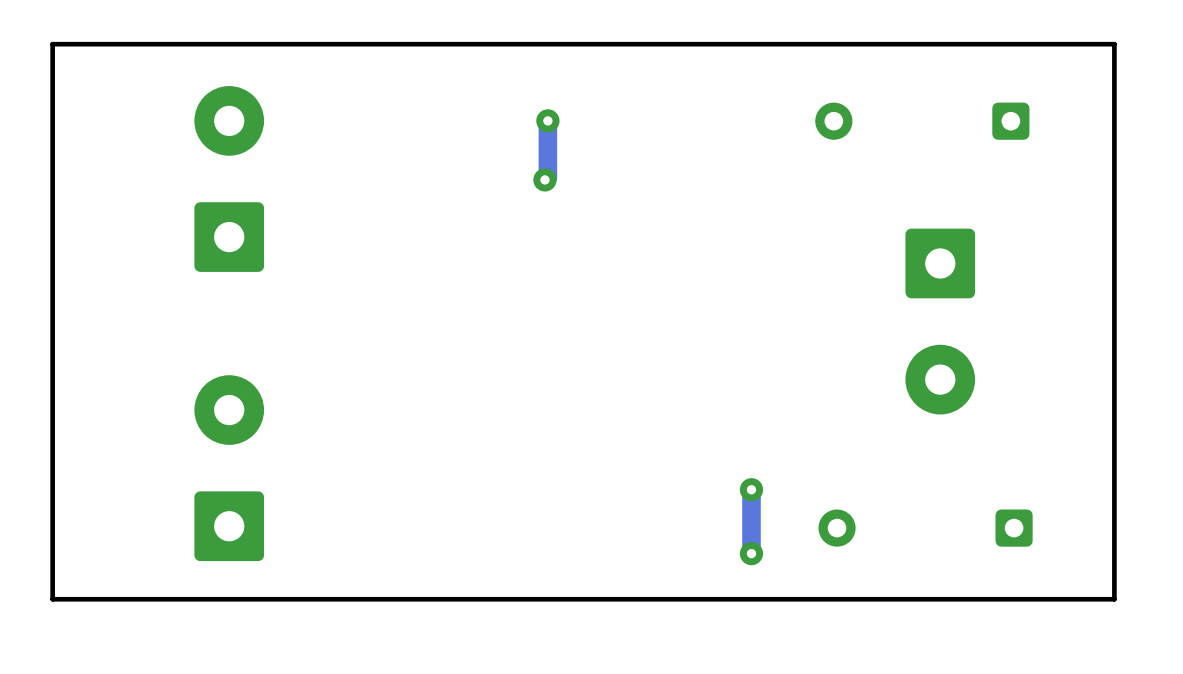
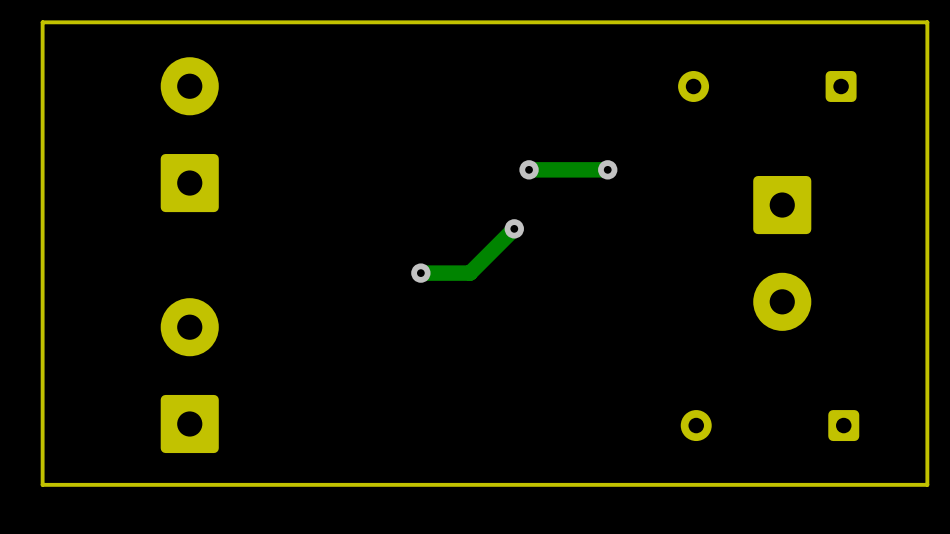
track: (547, 120) (547, 176) (544, 179) -> none
via: (547, 120) -> none
via: (544, 179) -> none
via: none -> (529, 169)
track: none -> (607, 169) (529, 169)
via: none -> (607, 169)
track: none -> (514, 228) (470, 273) (420, 273)
via: none -> (514, 228)
via: none -> (420, 273)
track: (751, 489) (751, 553) -> none
via: (751, 489) -> none
via: (751, 553) -> none

